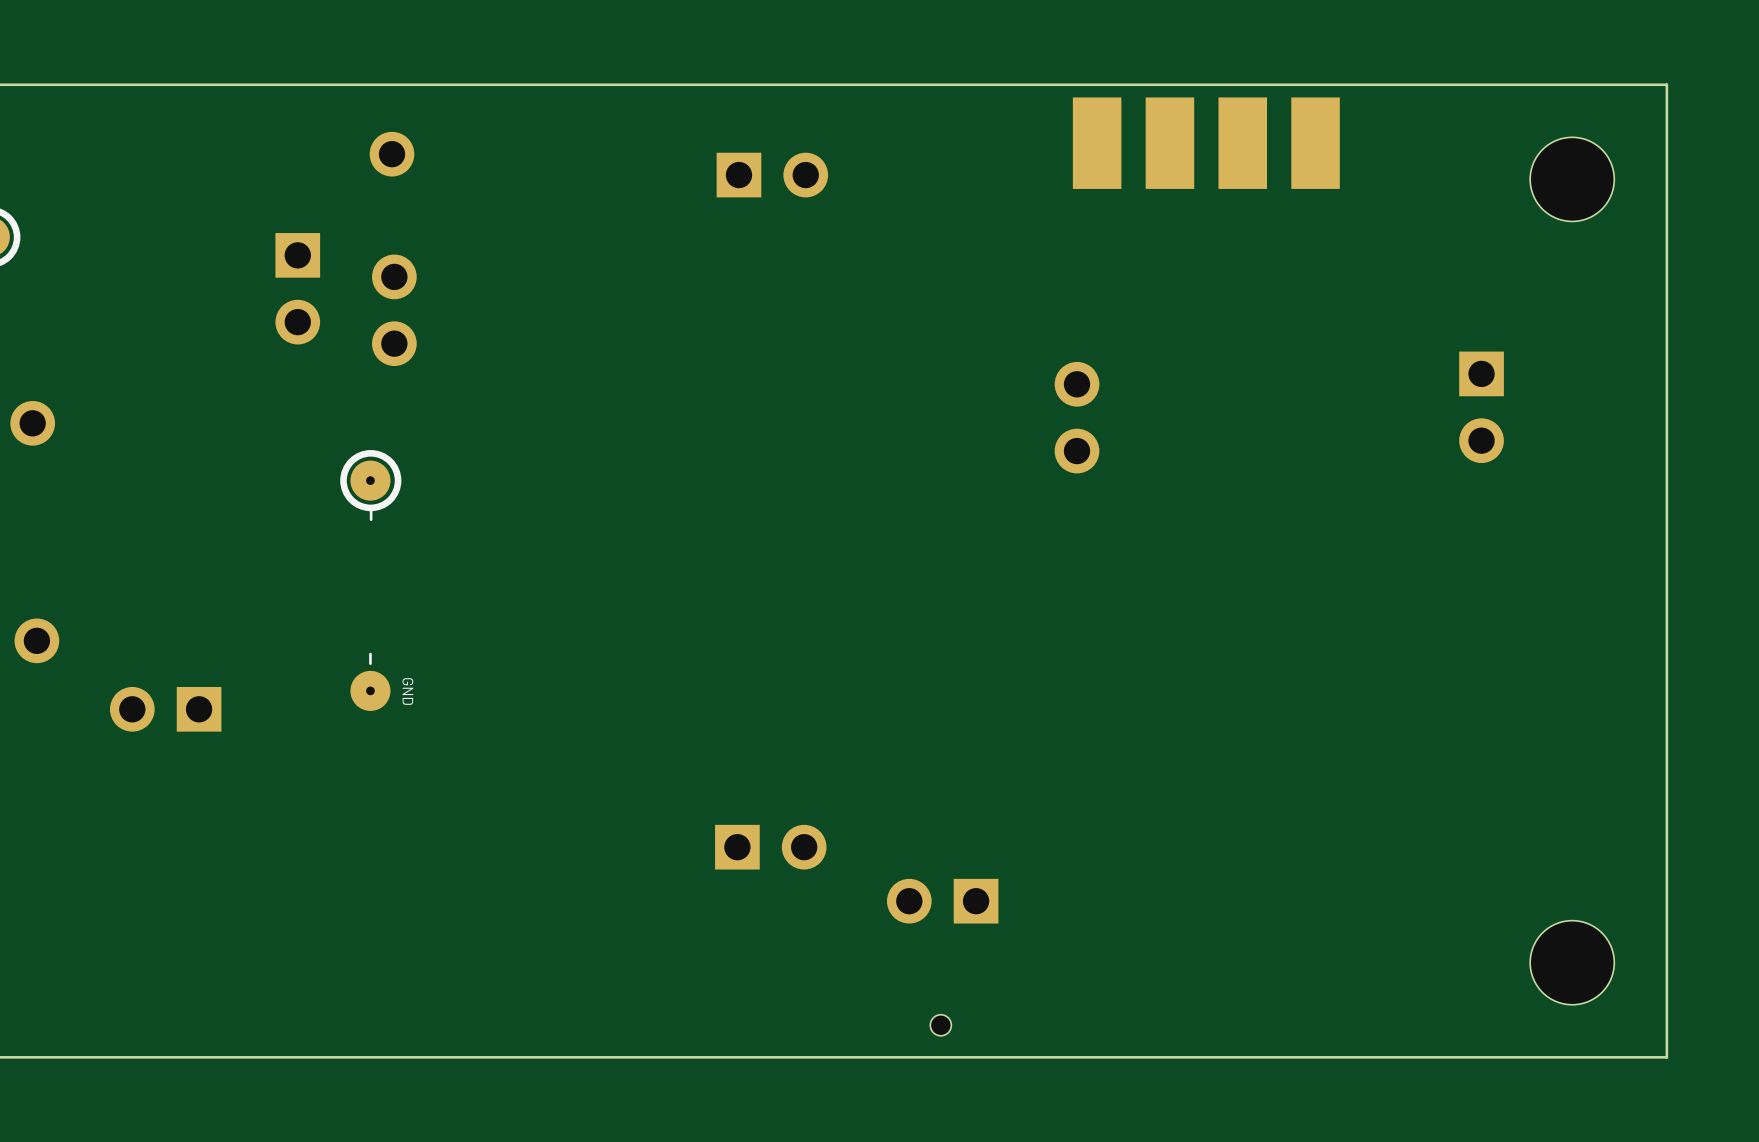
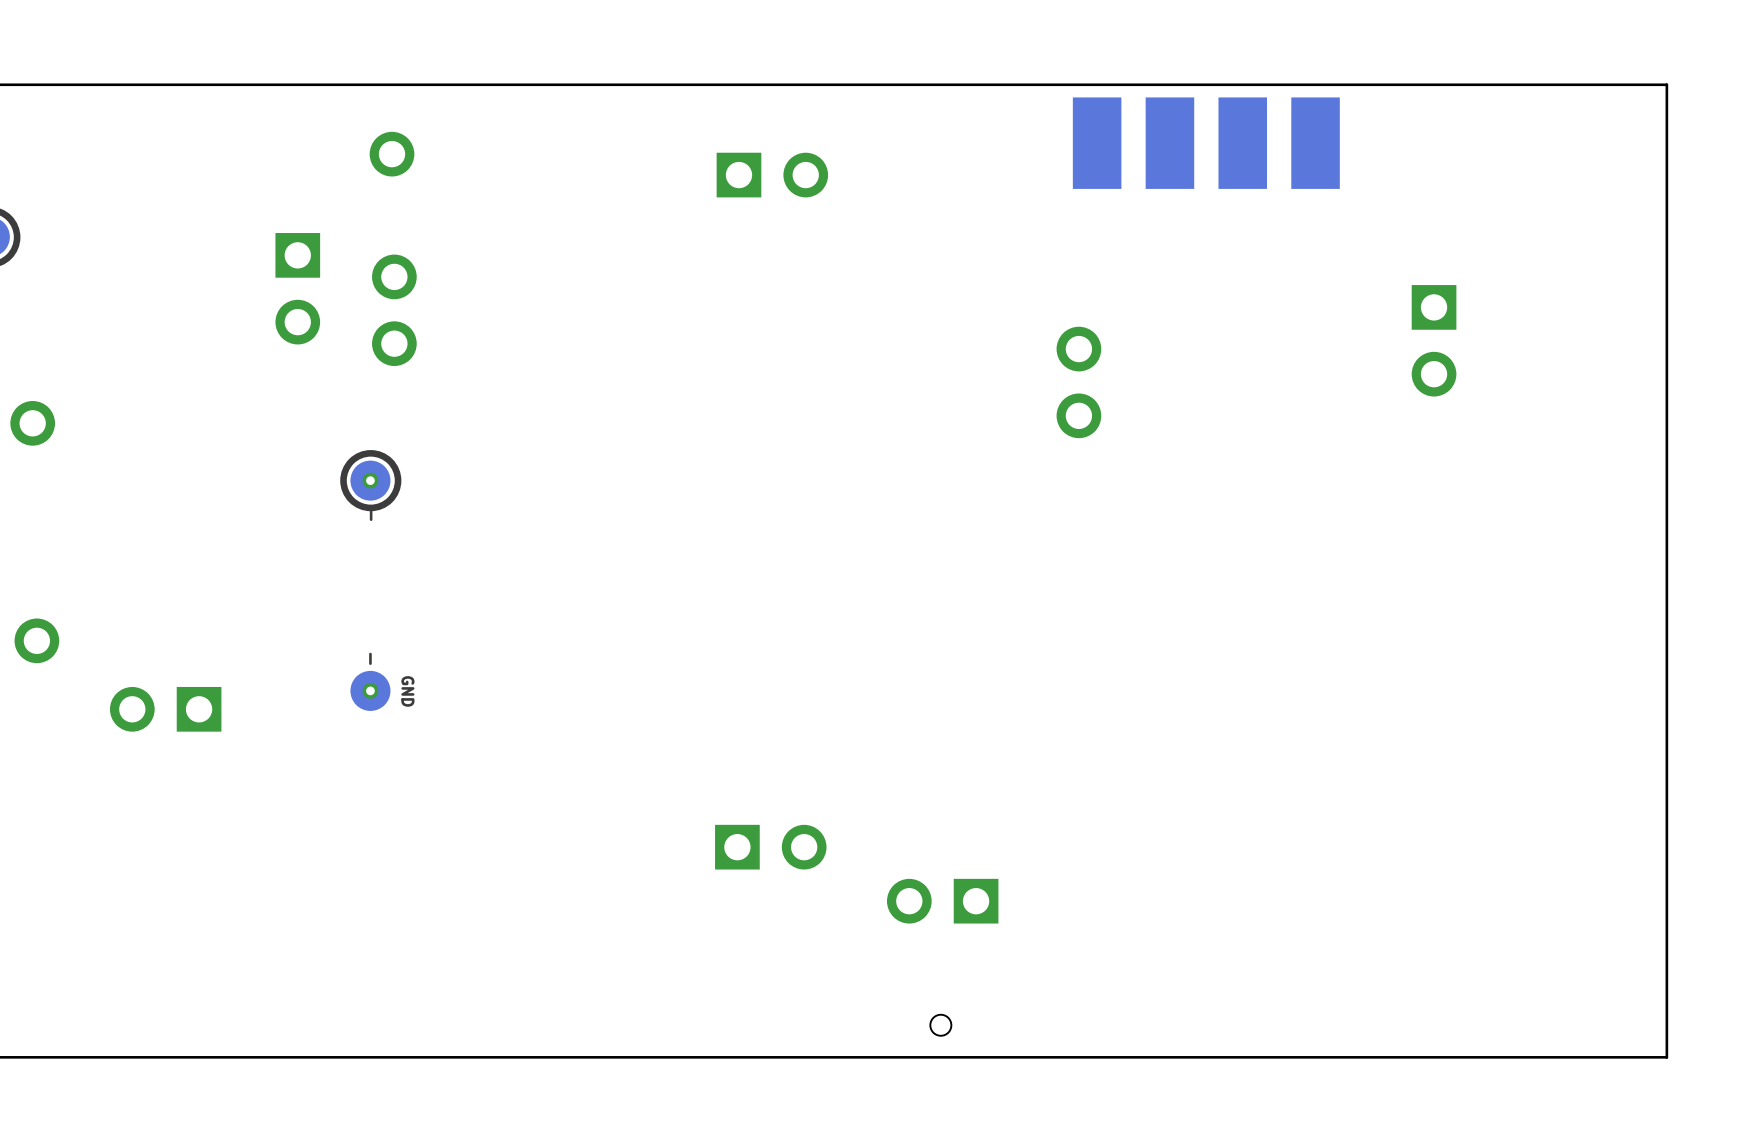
part: (1572, 179) -> none
part position: (1481, 407) -> (1434, 340)
part position: (1077, 417) -> (1078, 382)
part: (1572, 962) -> none

